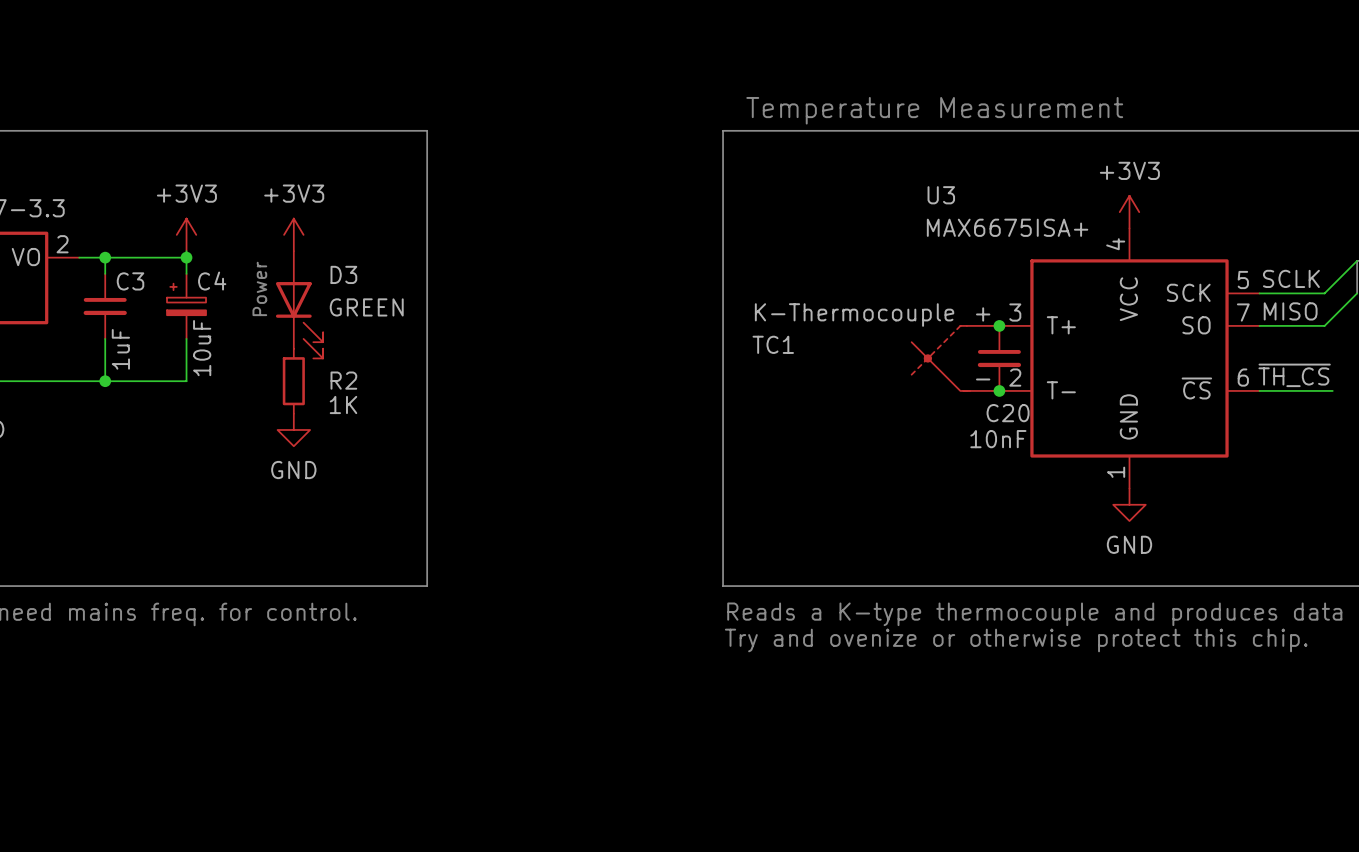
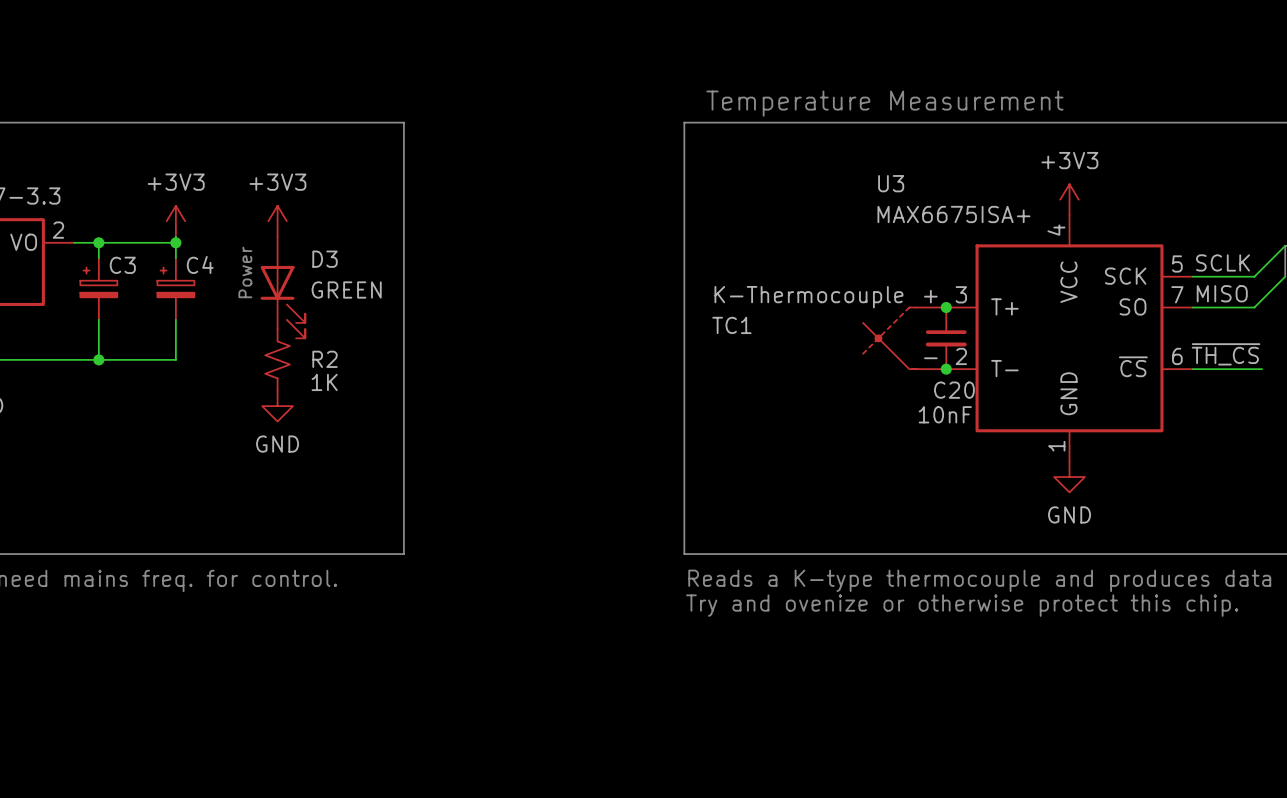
C3 symbol: [83, 273, 127, 339] -> [80, 258, 118, 320]
C4 value: 10uF (202, 348) -> none
R2 symbol: [282, 348, 305, 414] -> [265, 329, 290, 391]
C3 value: 1uF (120, 349) -> none

